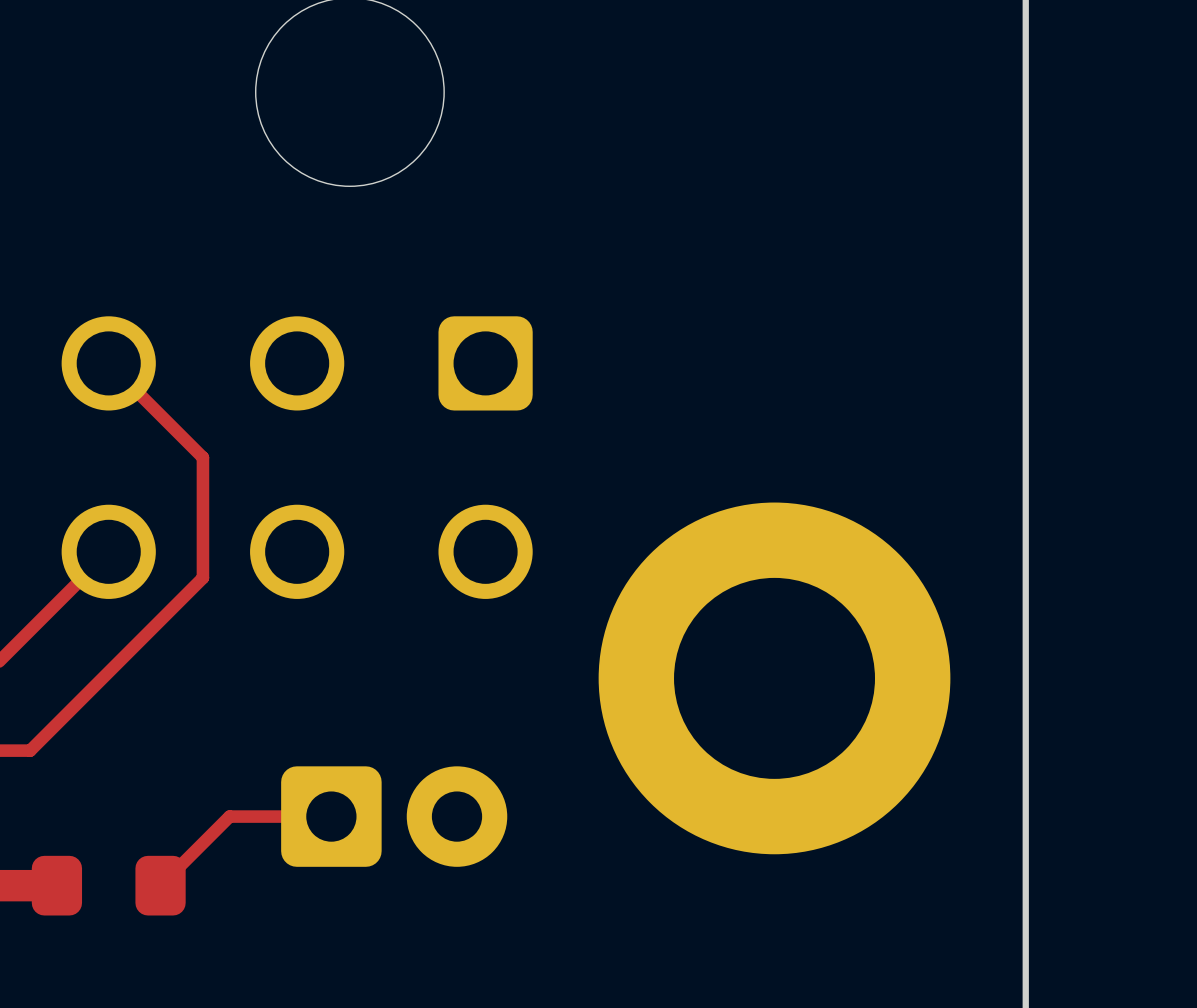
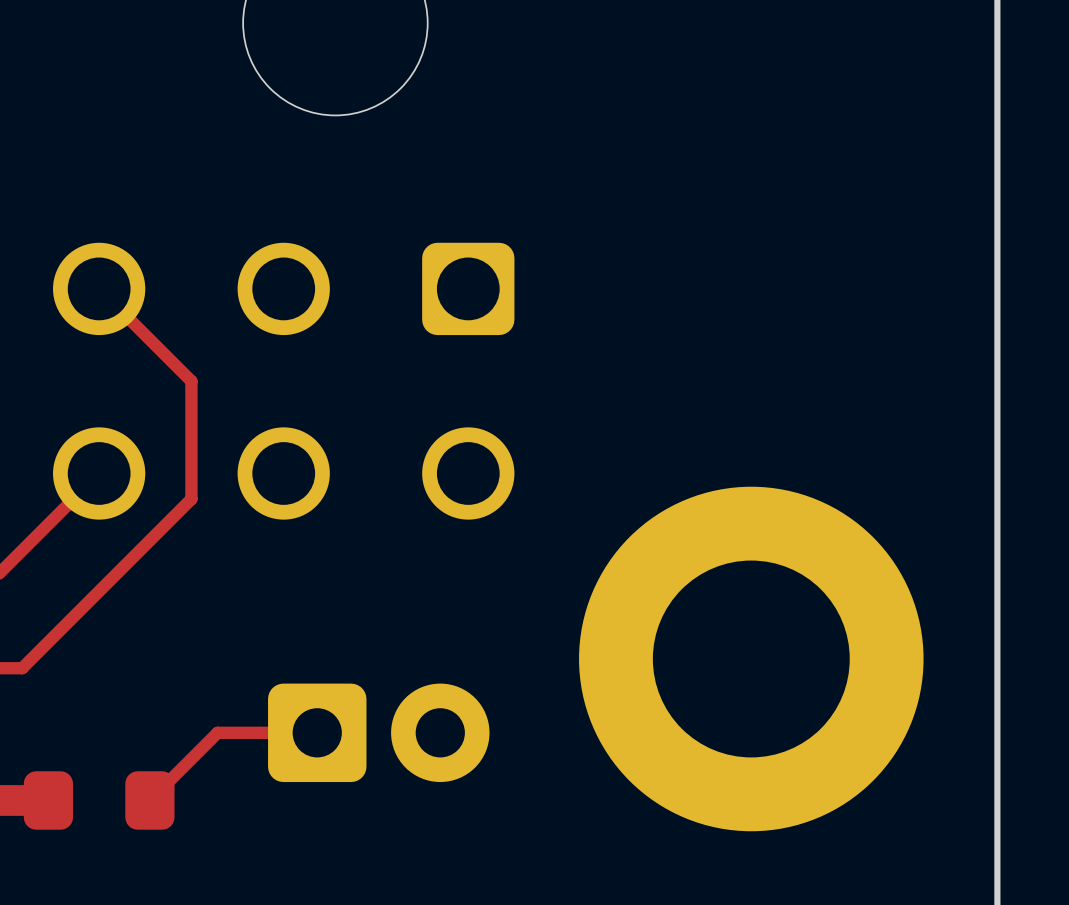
part position: (774, 678) -> (751, 658)

